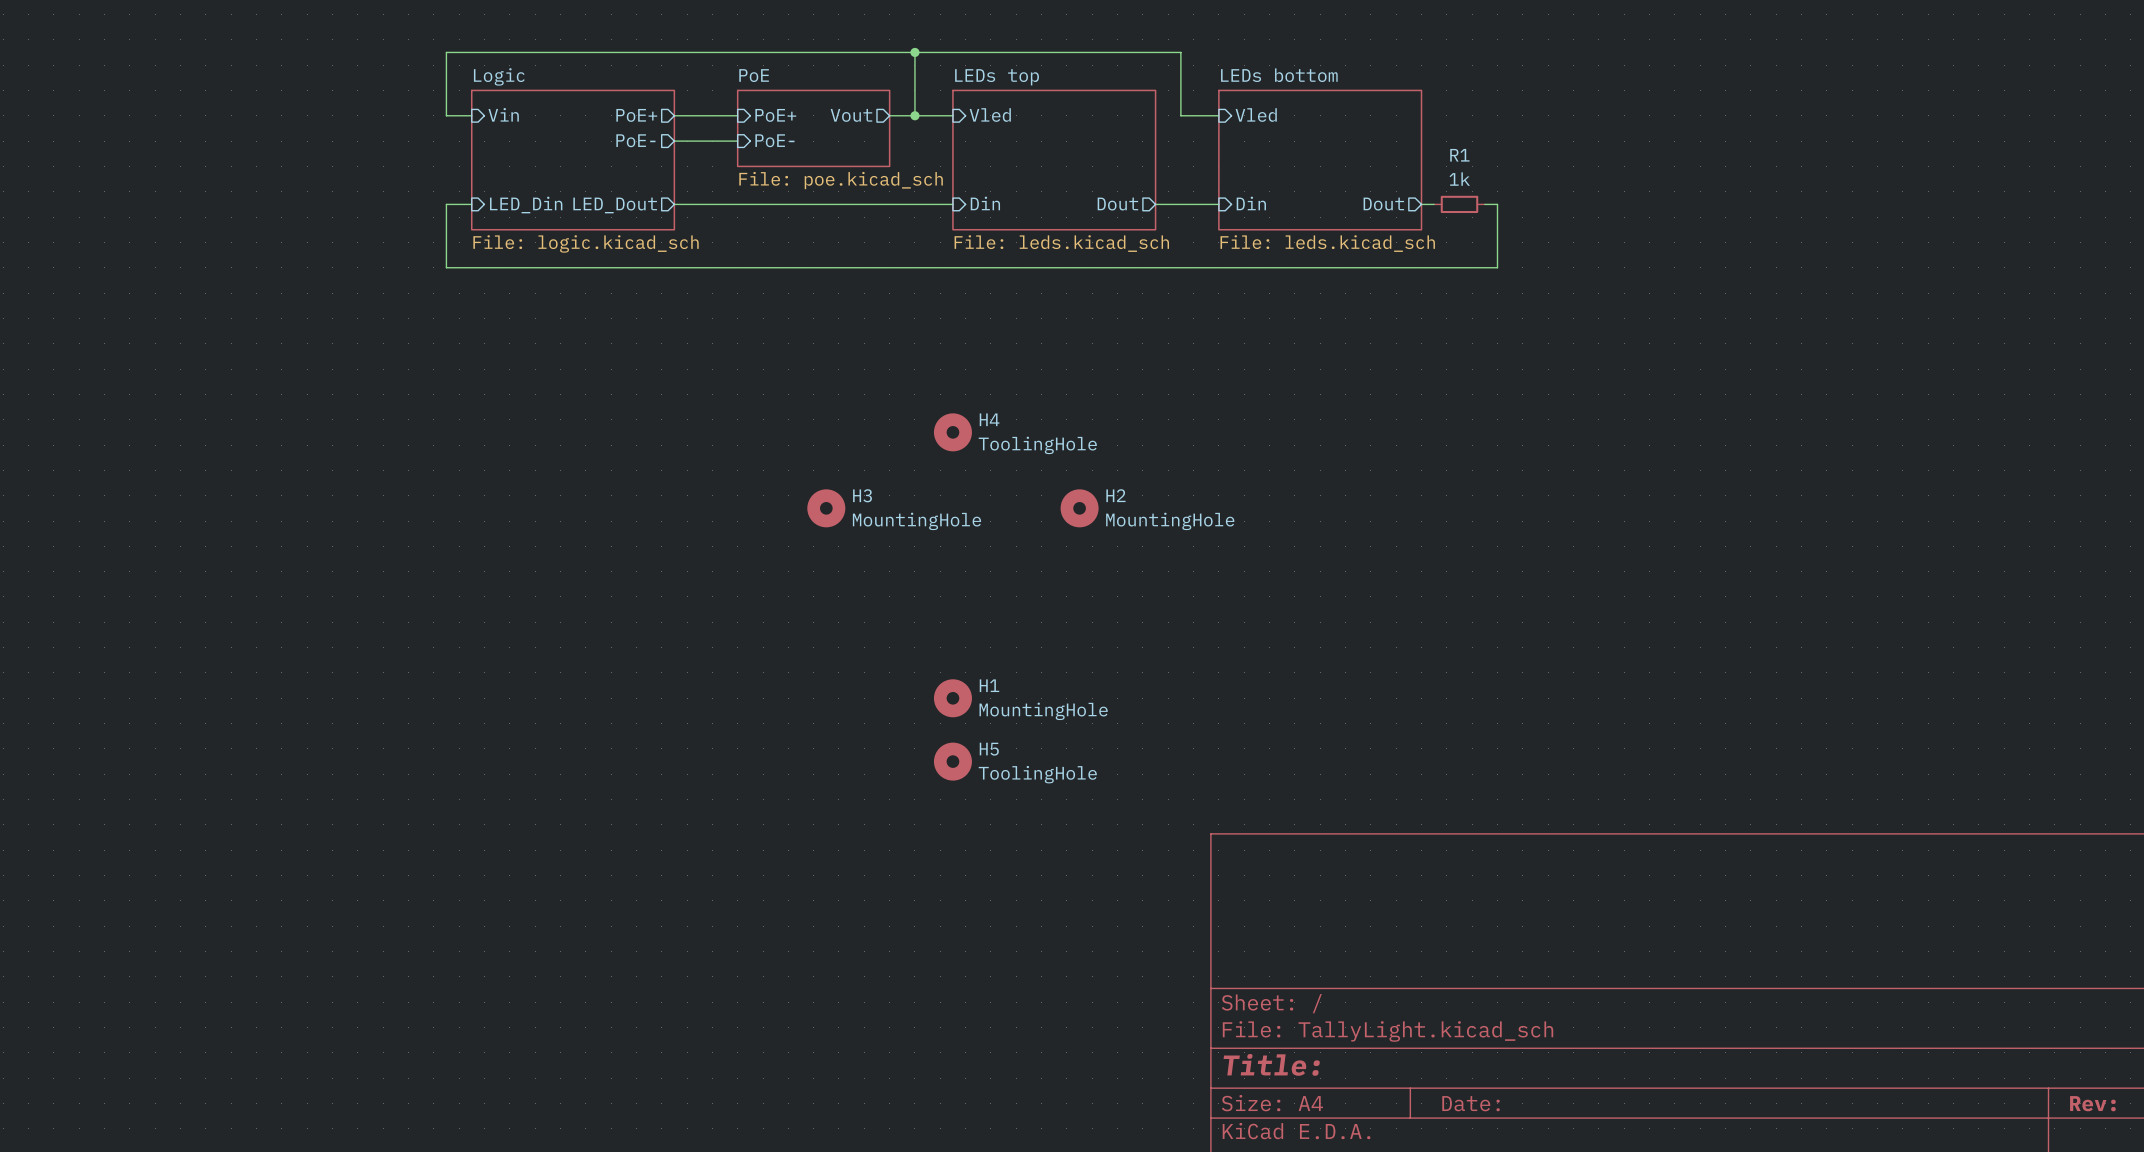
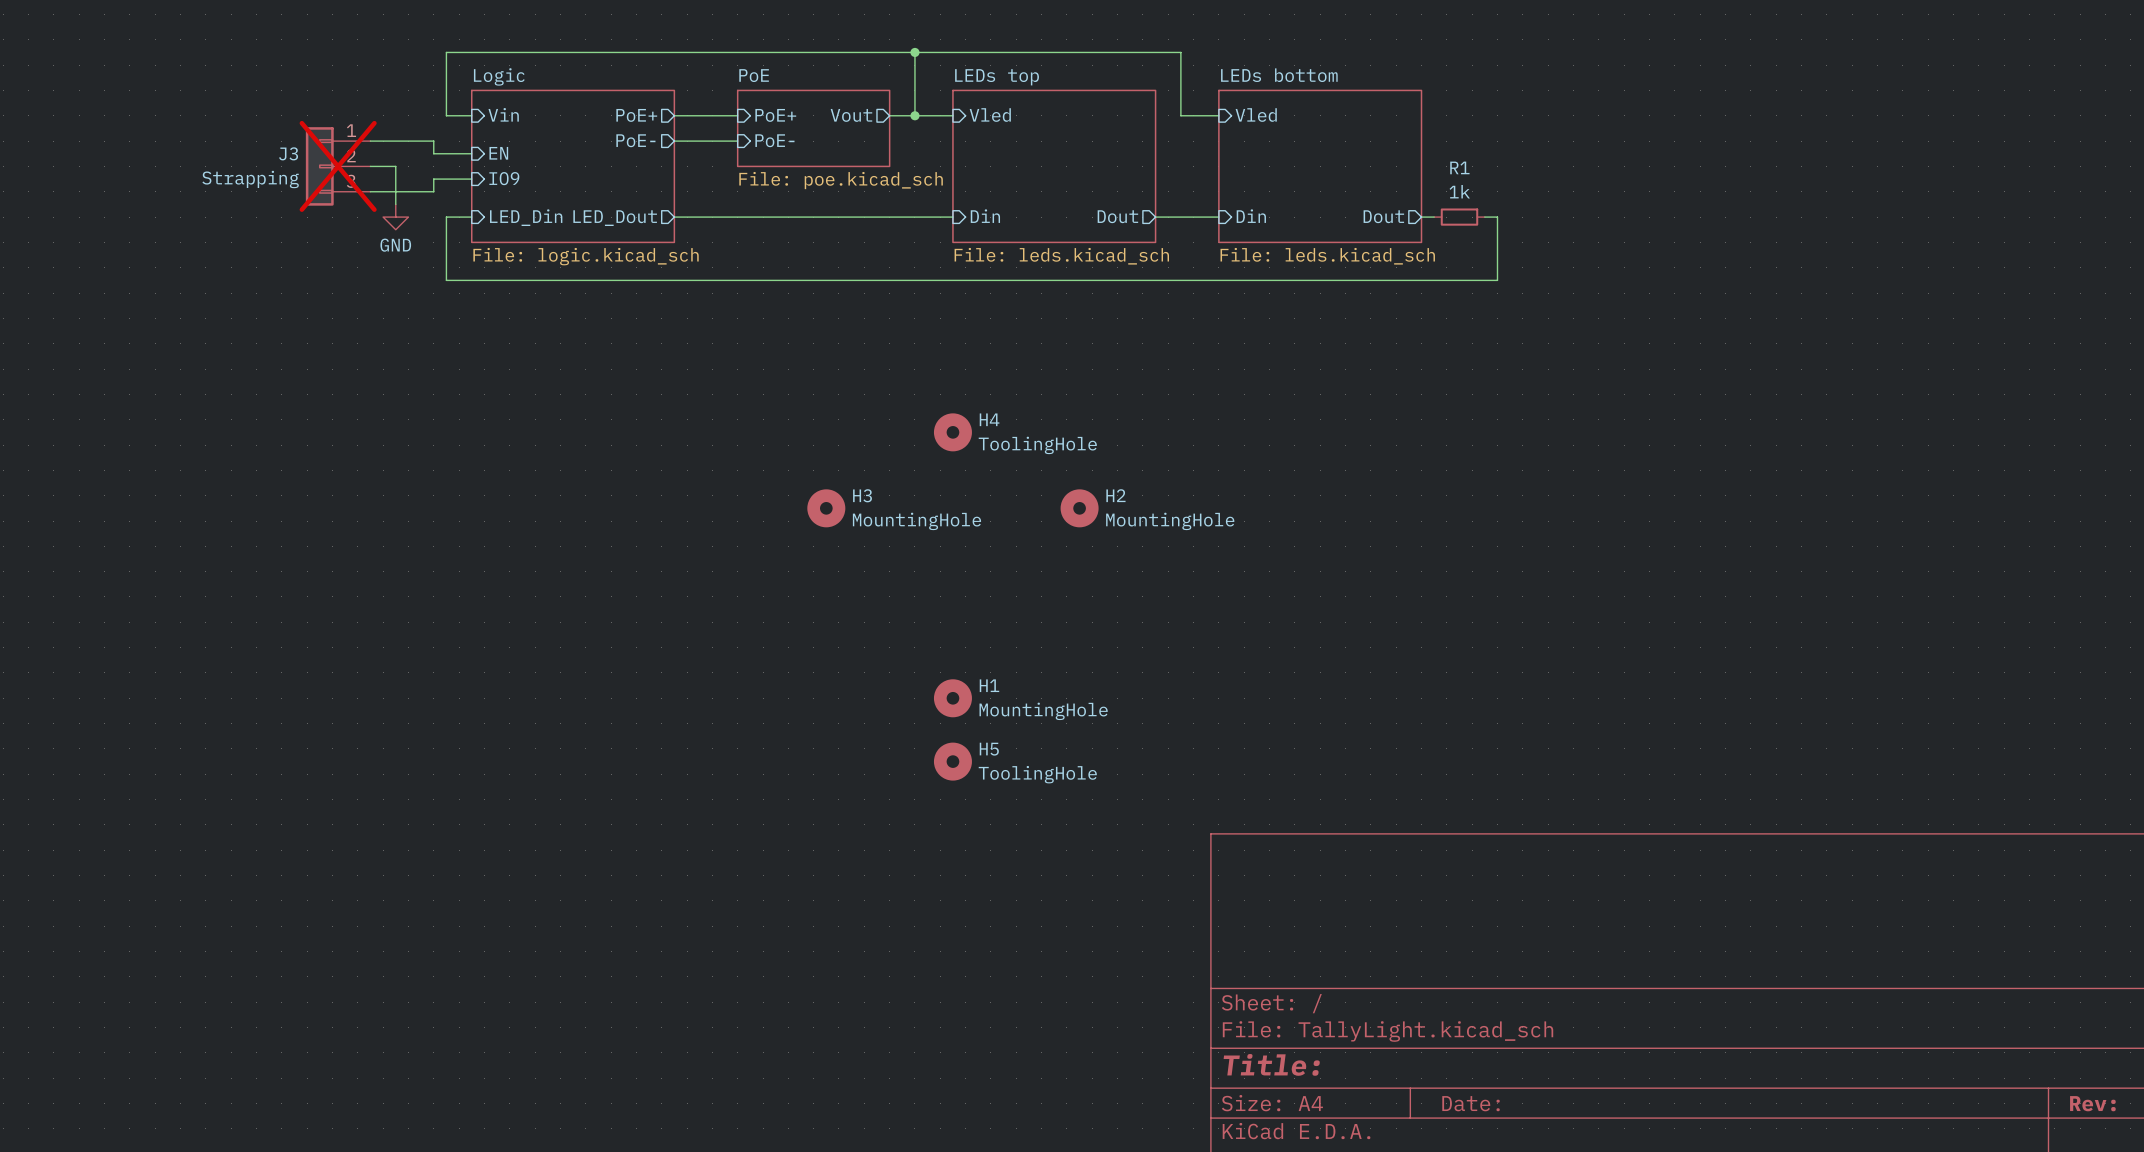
sheet Logic shape: [470, 89, 676, 231] -> [470, 89, 676, 244]
sheet LEDs top shape: [952, 89, 1157, 231] -> [952, 89, 1157, 244]
sheet LEDs bottom shape: [1218, 89, 1423, 231] -> [1218, 89, 1423, 244]
wire: none -> (370, 141) (433, 141) (433, 153) (471, 153)
sheet pin: none -> EN (498, 153)
J3: none -> Strapping (338, 166)
wire: none -> (370, 166) (395, 166) (395, 204)
sheet pin: none -> IO9 (504, 178)
wire: none -> (471, 179) (433, 179) (433, 191) (370, 191)
sheet pin position: Din (985, 203) -> Din (985, 216)
sheet pin position: Din (1251, 203) -> Din (1251, 216)
wire: (471, 204) (446, 204) (446, 217) -> (471, 217) (446, 217)
wire: (674, 204) (952, 204) -> (674, 217) (952, 217)
sheet pin position: Dout (1117, 204) -> Dout (1117, 216)
wire: (1155, 204) (1218, 204) -> (1155, 217) (1218, 217)
sheet pin position: Dout (1383, 204) -> Dout (1383, 216)
wire: (1421, 204) (1434, 204) -> (1421, 217) (1434, 217)
R1 position: (1459, 204) -> (1459, 217)
wire: (1484, 204) (1497, 204) (1497, 217) -> (1484, 217) (1497, 217)
sheet pin position: LED_Din (526, 205) -> LED_Din (526, 217)
sheet pin position: LED_Dout (615, 205) -> LED_Dout (615, 218)
power symbol: none -> GND (395, 217)
wire: (446, 267) (1497, 267) -> (446, 267) (446, 280) (1497, 280) (1497, 267)

